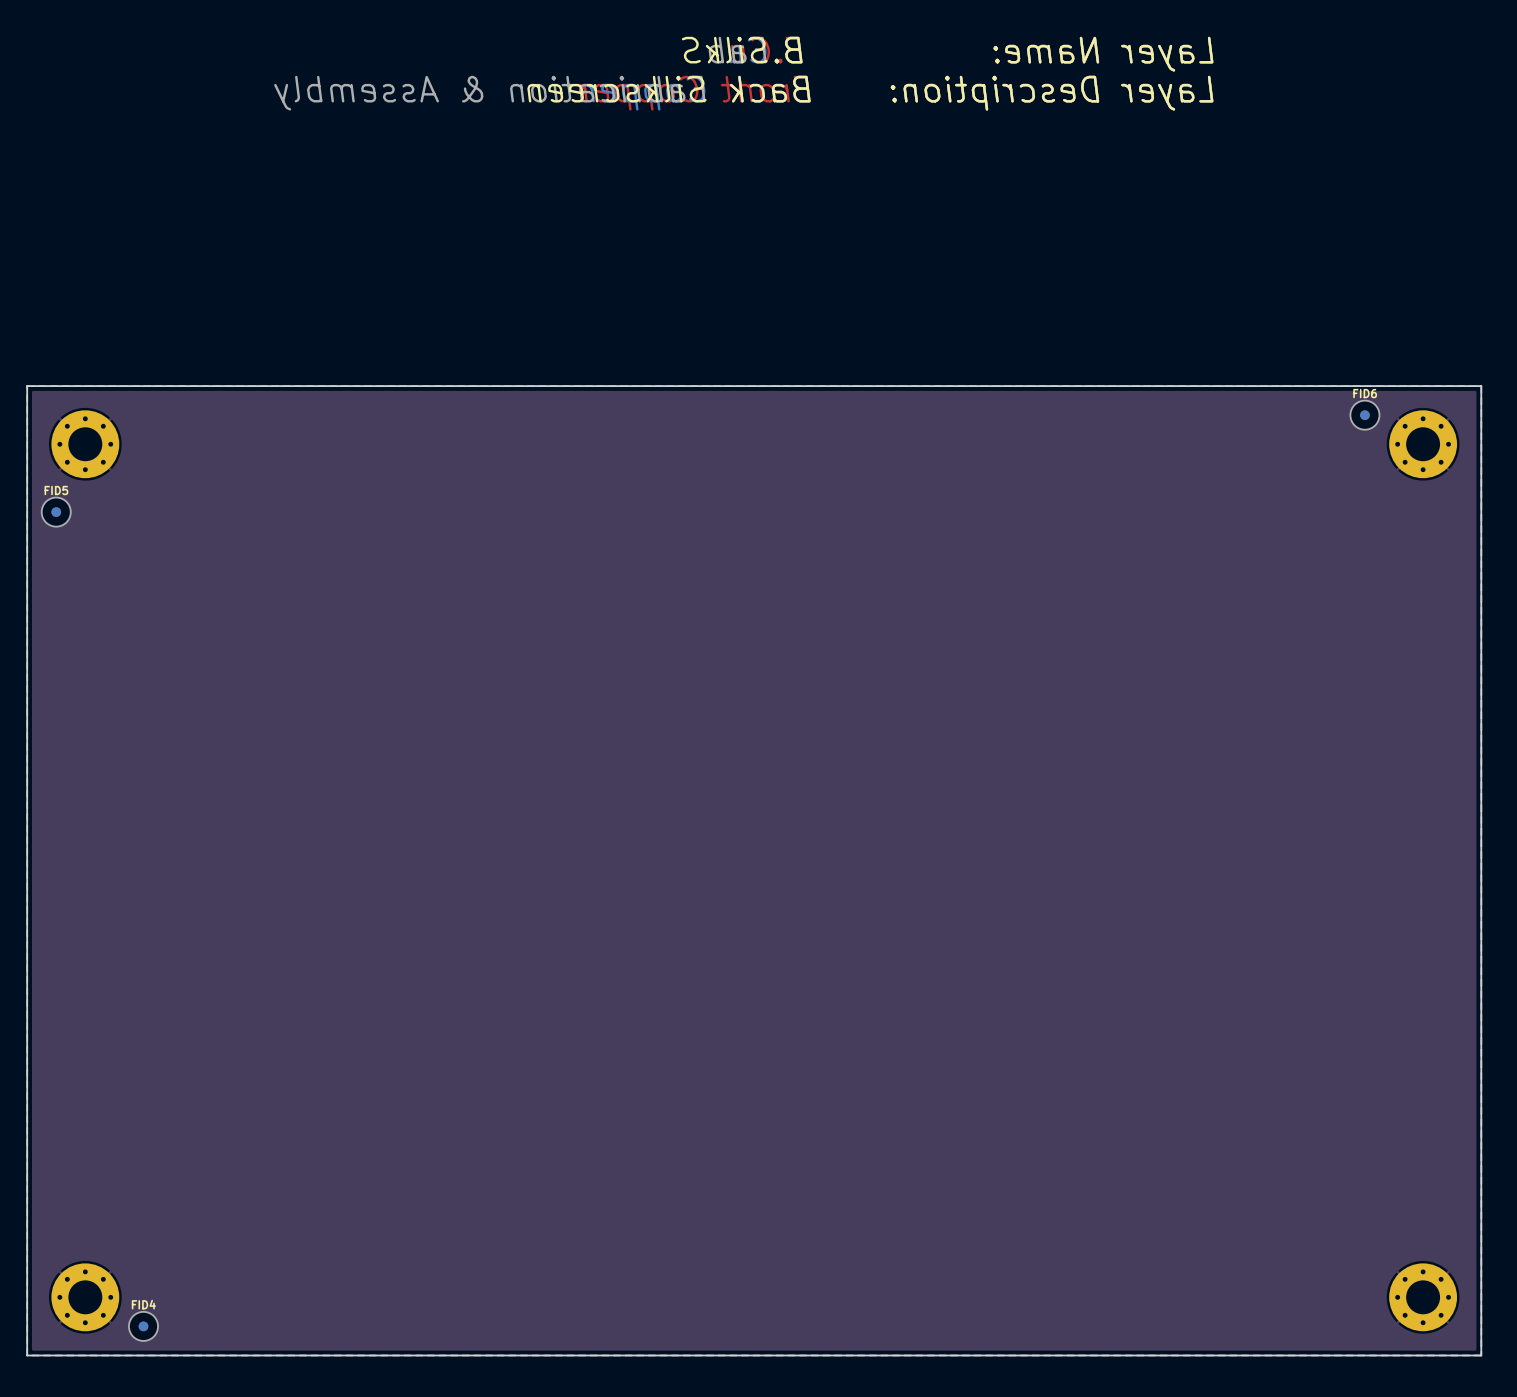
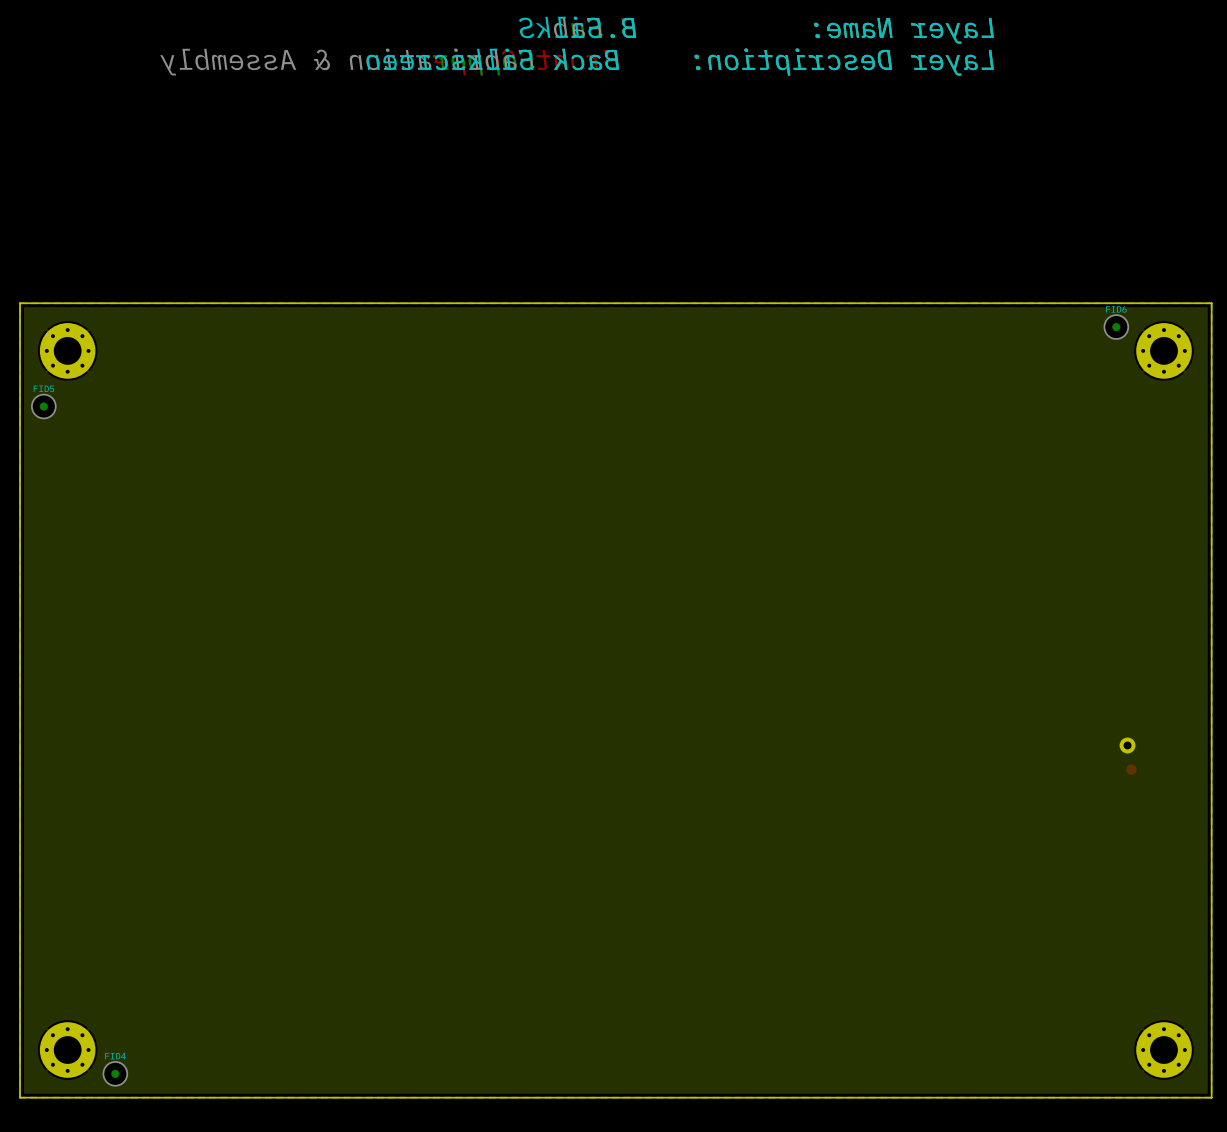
part: none -> (1127, 745)
part: none -> (1131, 769)

